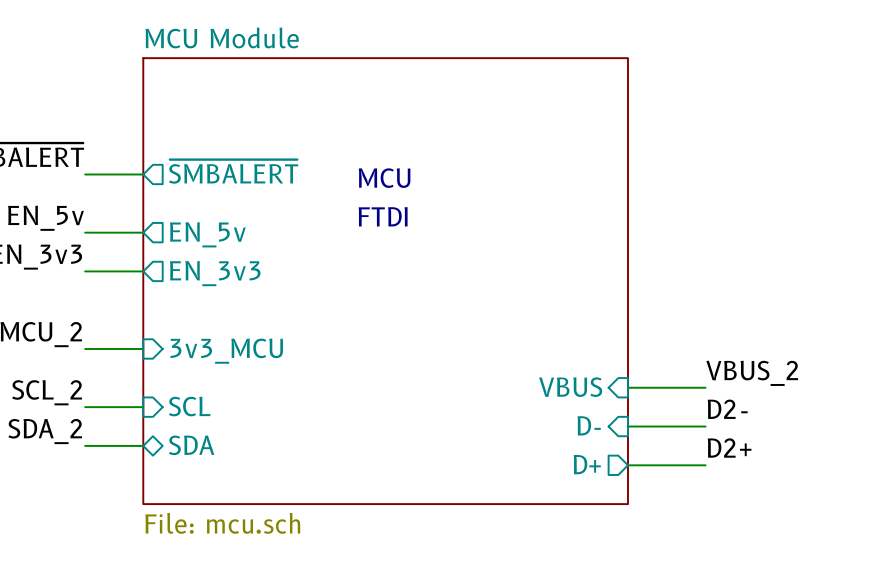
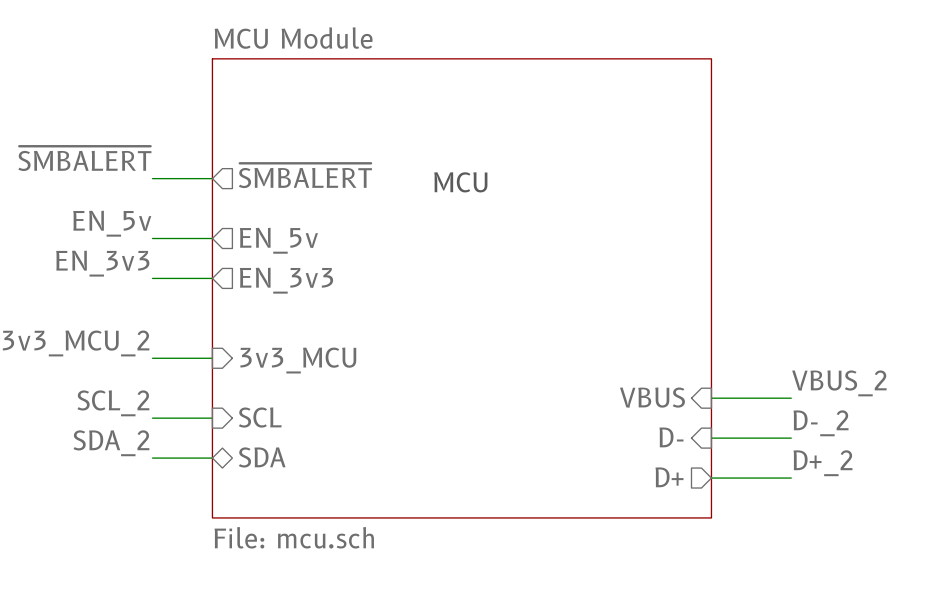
text: FTDI (383, 216) -> none
label: D2- (727, 409) -> D-_2 (821, 423)
label: D2+ (729, 448) -> D+_2 (822, 463)

